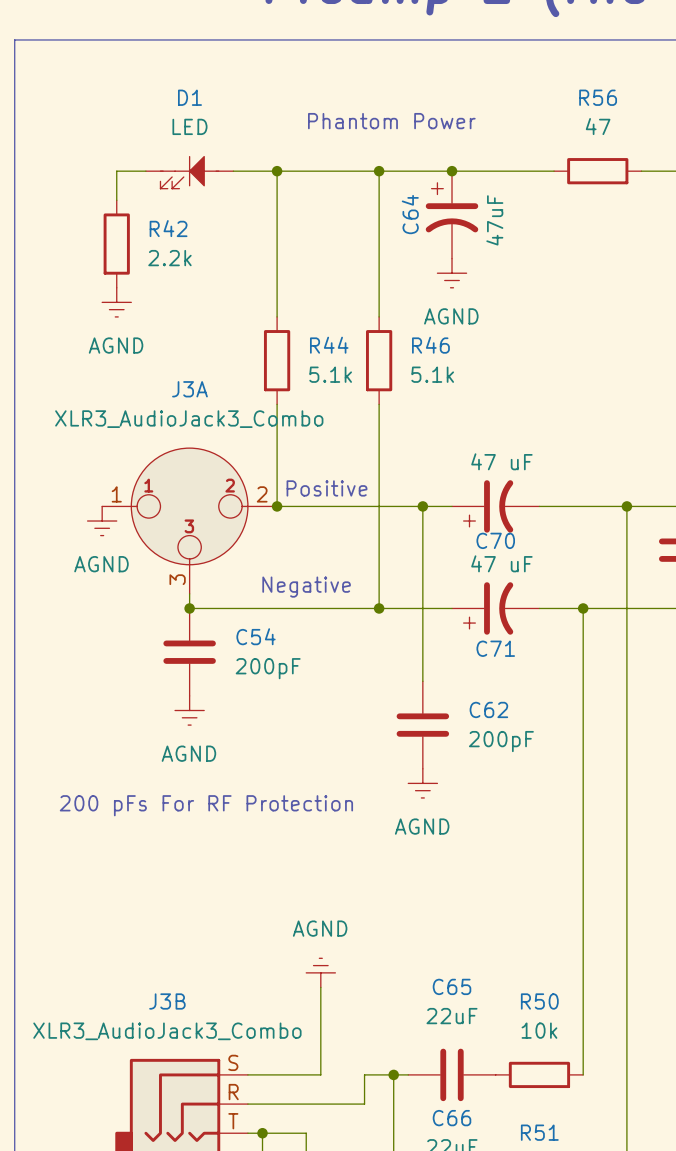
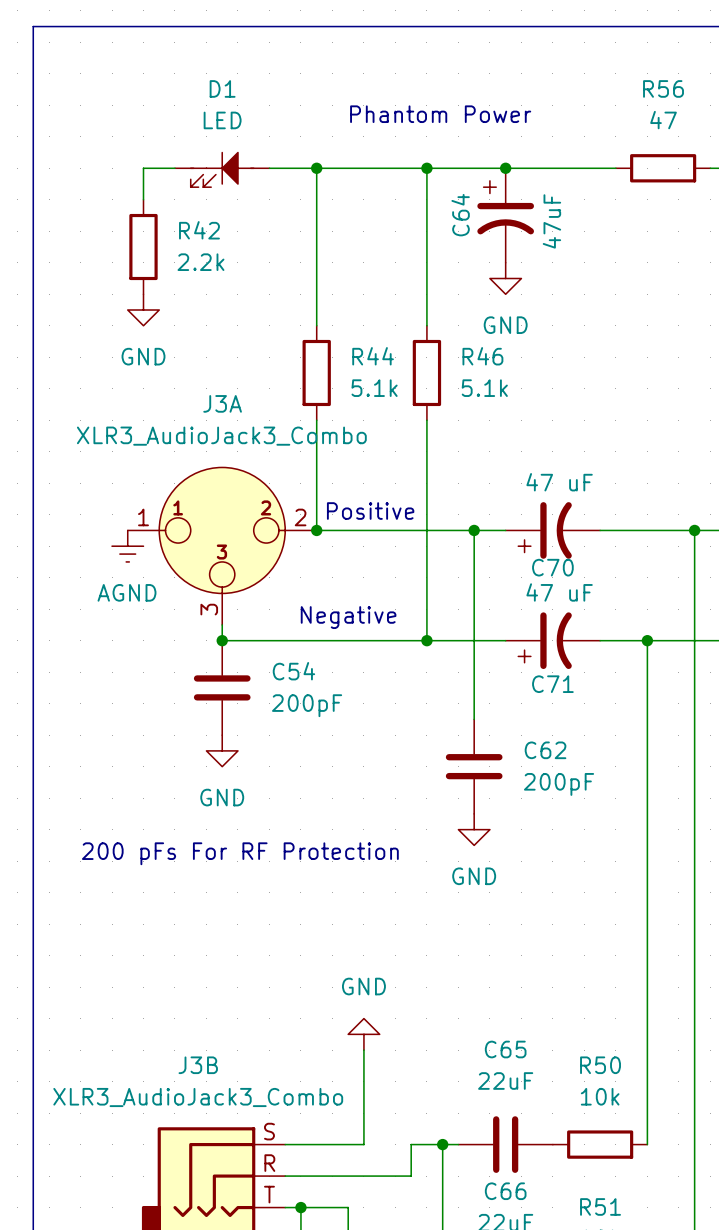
power symbol: AGND (452, 273) -> GND (505, 278)
power symbol: AGND (116, 302) -> GND (143, 310)
power symbol: AGND (189, 710) -> GND (222, 750)
power symbol: AGND (422, 783) -> GND (474, 829)
power symbol: AGND (320, 972) -> GND (363, 1034)

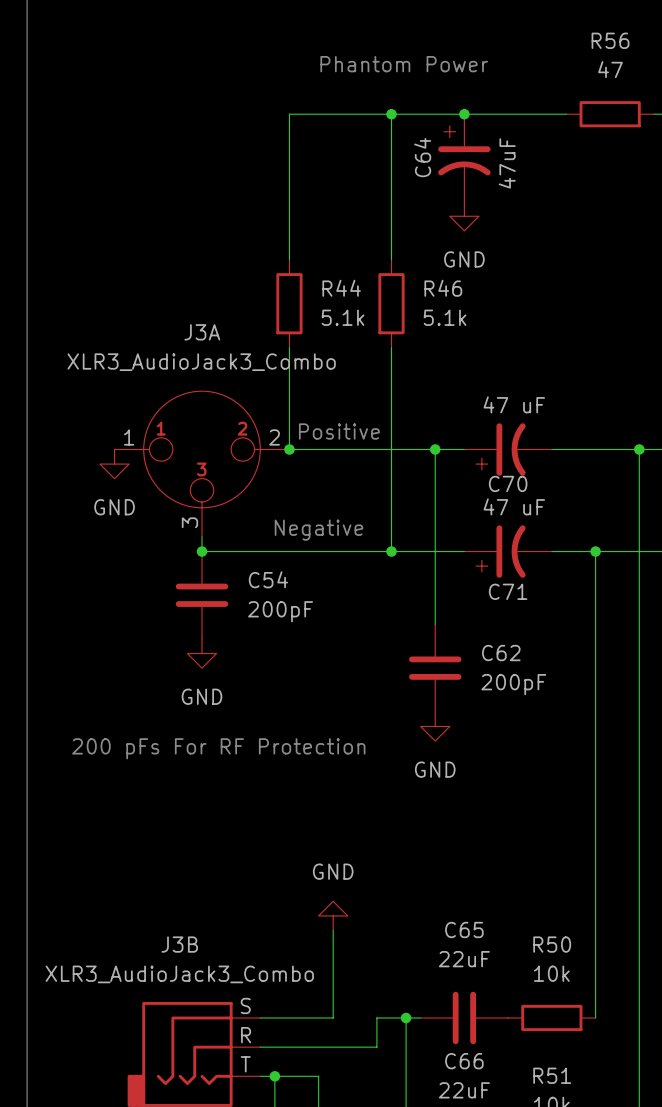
wire: (174, 168) (143, 168) (143, 199) -> none
wire: (269, 168) (316, 168) -> none
junction: (316, 168) -> none
D1: LED (222, 169) -> none
R42: 2.2k (143, 247) -> none
power symbol: GND (143, 310) -> none
power symbol: AGND (127, 546) -> GND (114, 464)

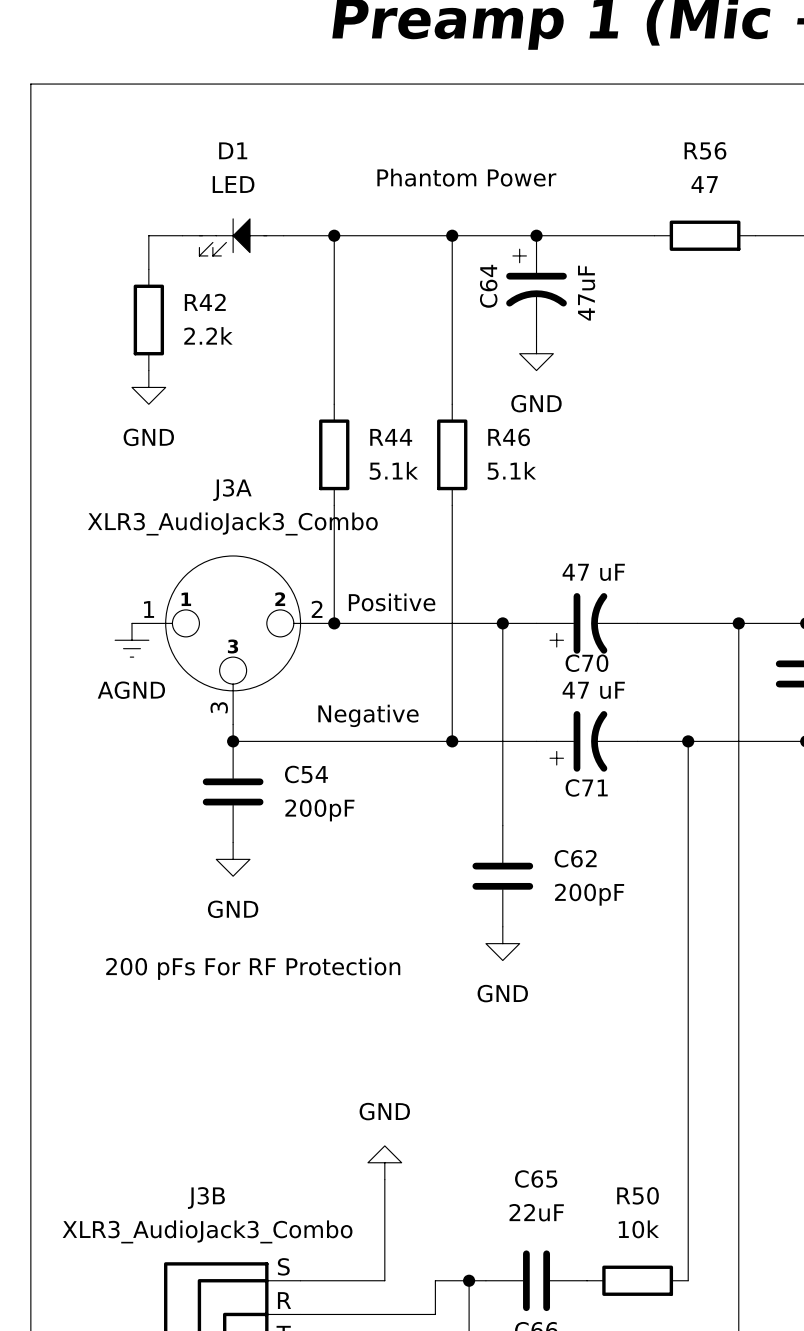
wire: none -> (182, 235) (148, 235) (148, 269)
wire: none -> (283, 235) (334, 235)
junction: none -> (334, 235)
D1: none -> LED (233, 237)
R42: none -> 2.2k (148, 320)
power symbol: none -> GND (148, 387)
power symbol: GND (114, 464) -> AGND (131, 640)

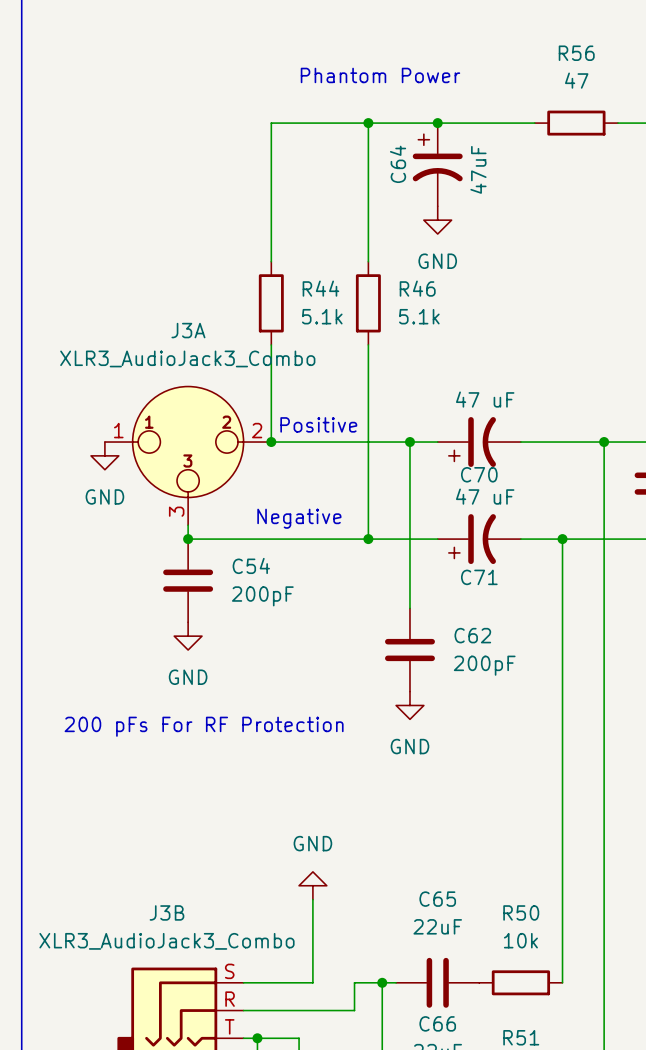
wire: (182, 235) (148, 235) (148, 269) -> none
wire: (283, 235) (334, 235) -> none
junction: (334, 235) -> none
D1: LED (233, 237) -> none
R42: 2.2k (148, 320) -> none
power symbol: GND (148, 387) -> none
power symbol: AGND (131, 640) -> GND (104, 455)

